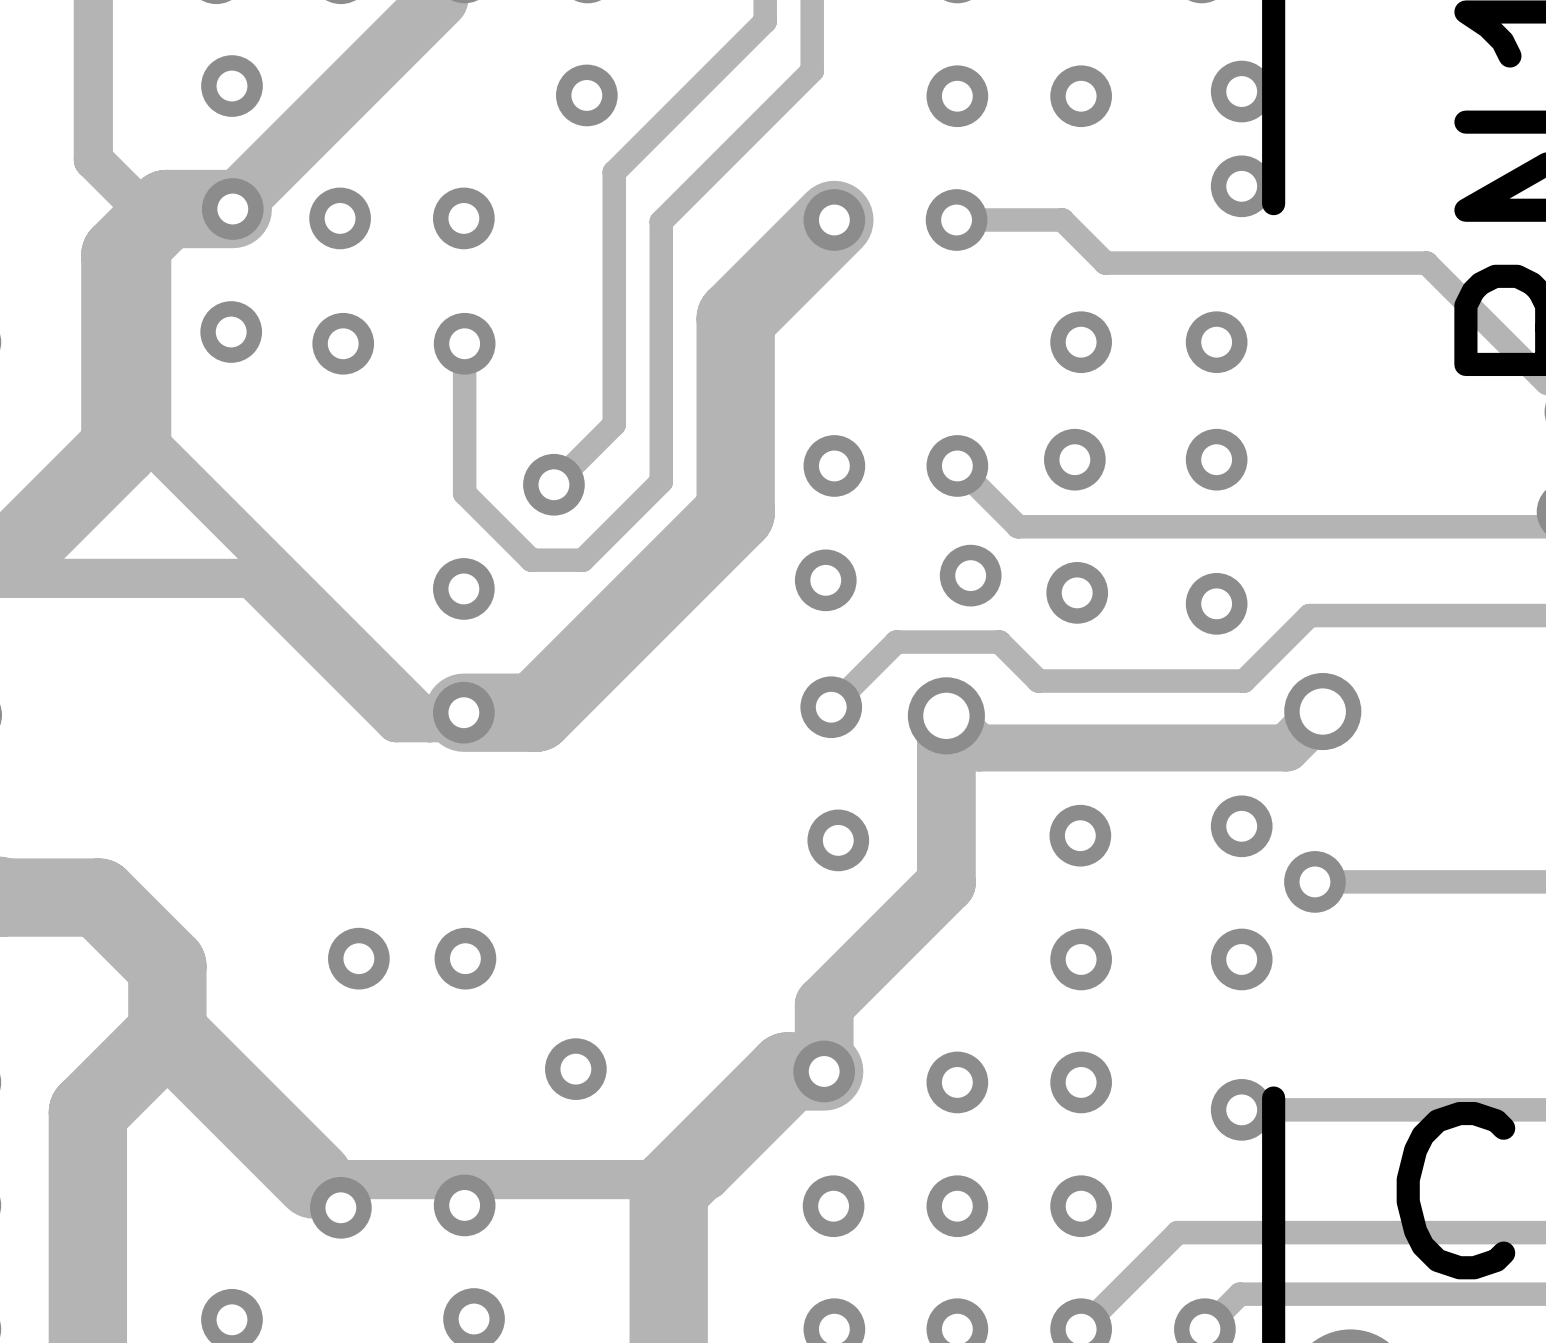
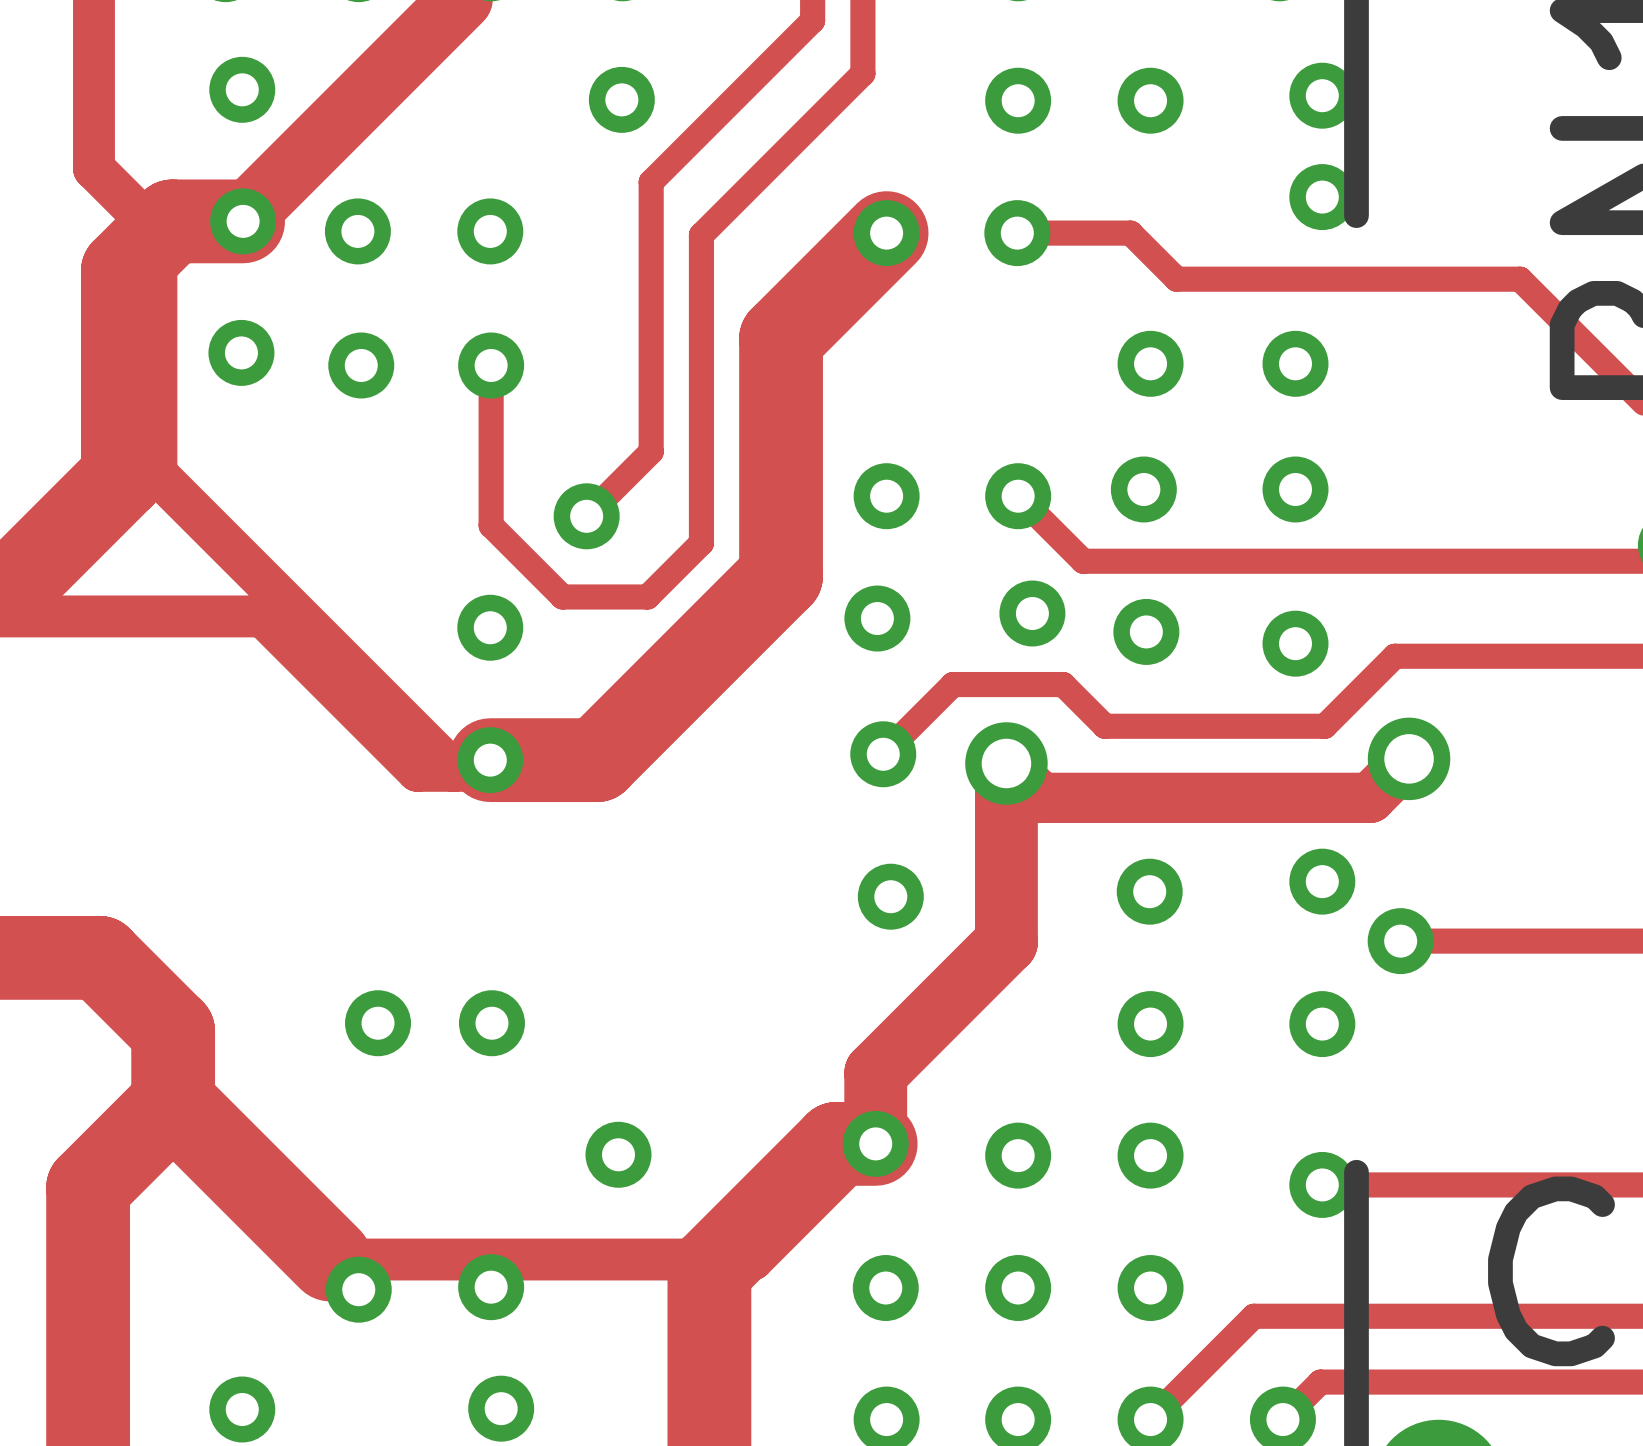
track: (661, 481) (582, 560) -> (701, 513) (701, 543) (647, 596) (617, 596)
track: (735, 512) (535, 712) -> (781, 546) (781, 576) (597, 760) (566, 760)
via position: (575, 1069) -> (618, 1154)

